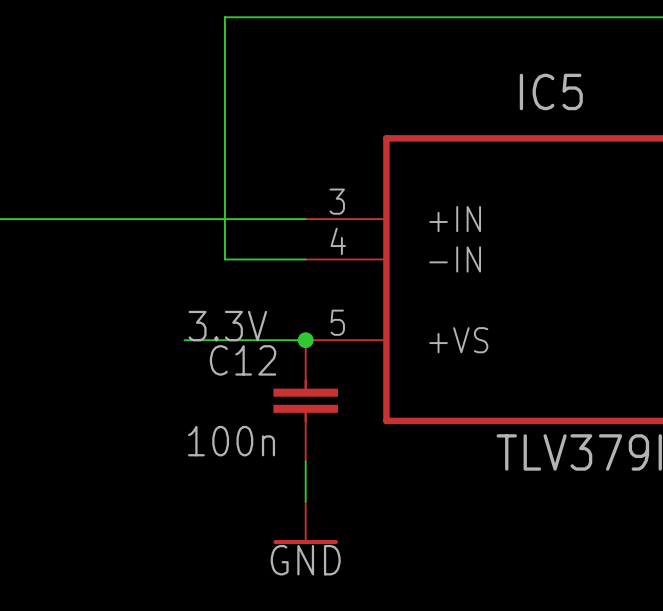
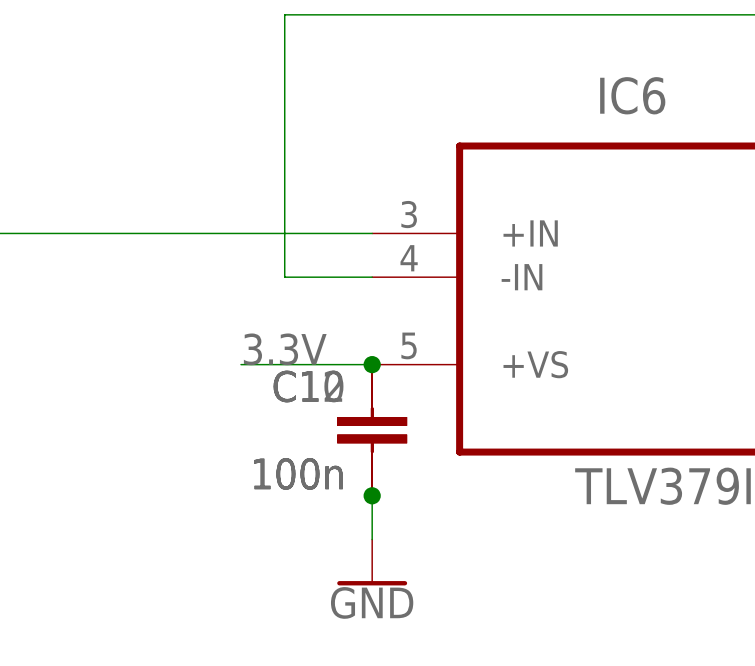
IC5 name: IC5 (551, 91) -> IC6 (632, 95)
part: none -> 100n (372, 430)
junction: none -> (372, 495)

